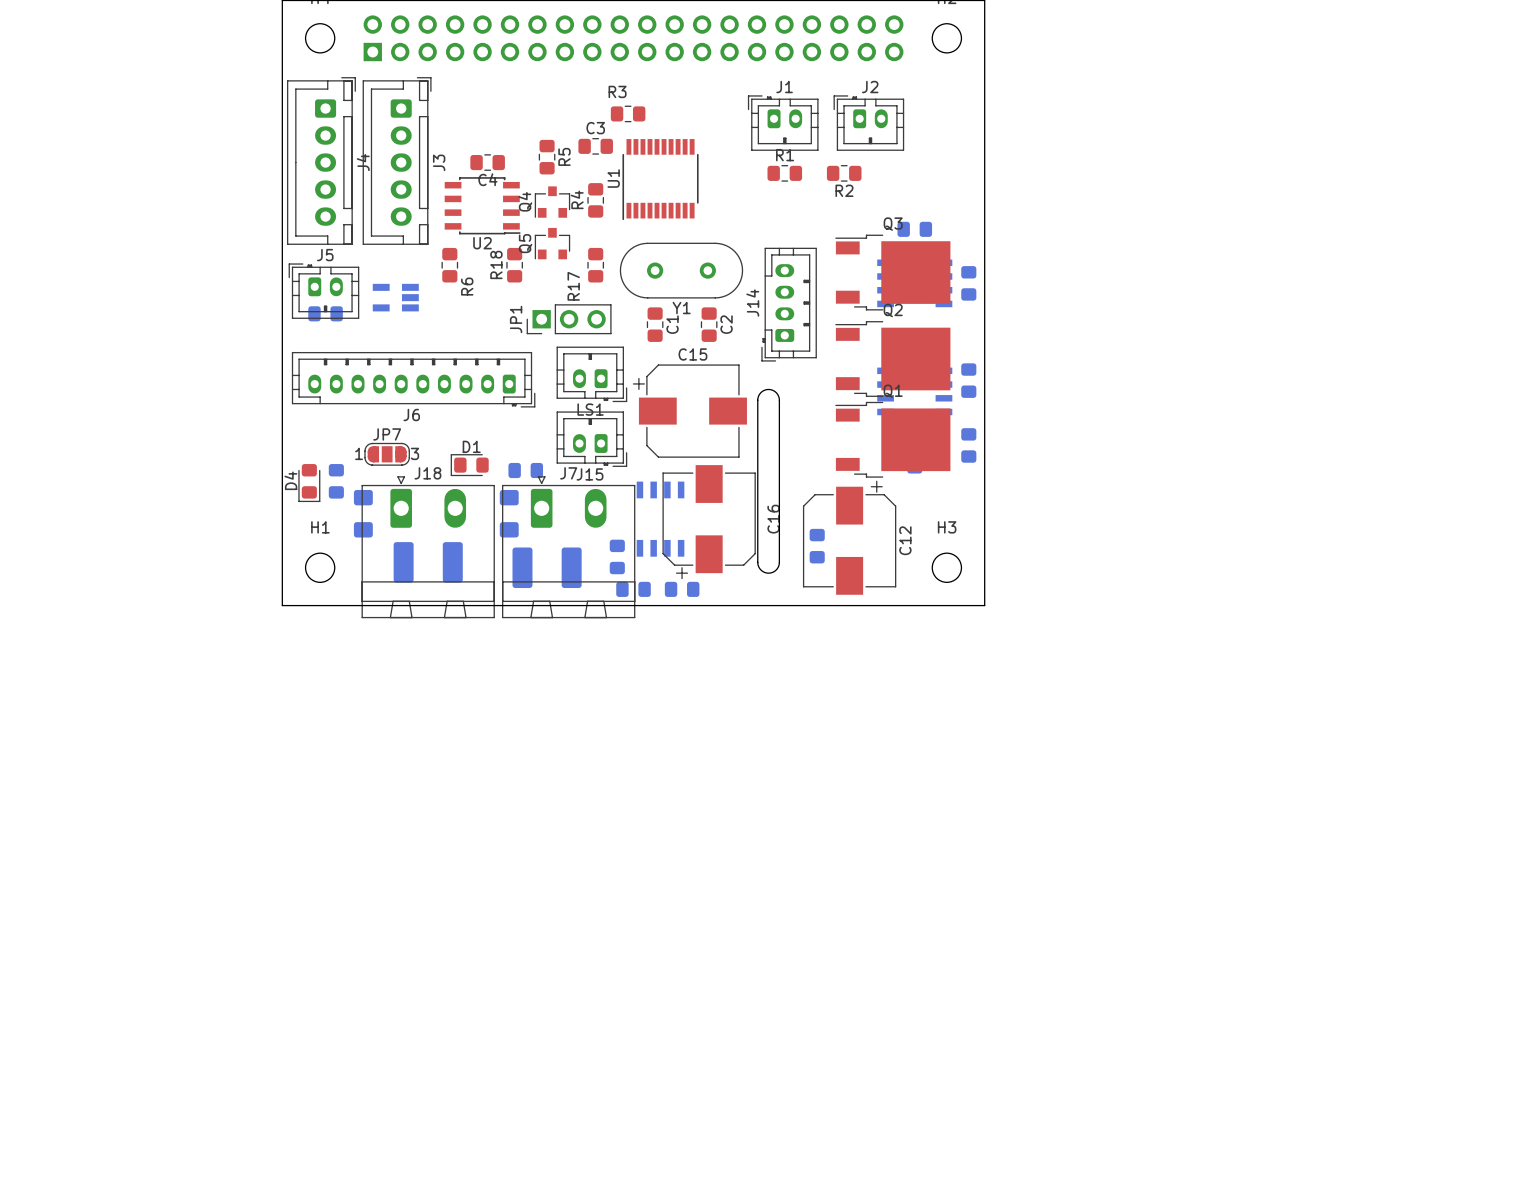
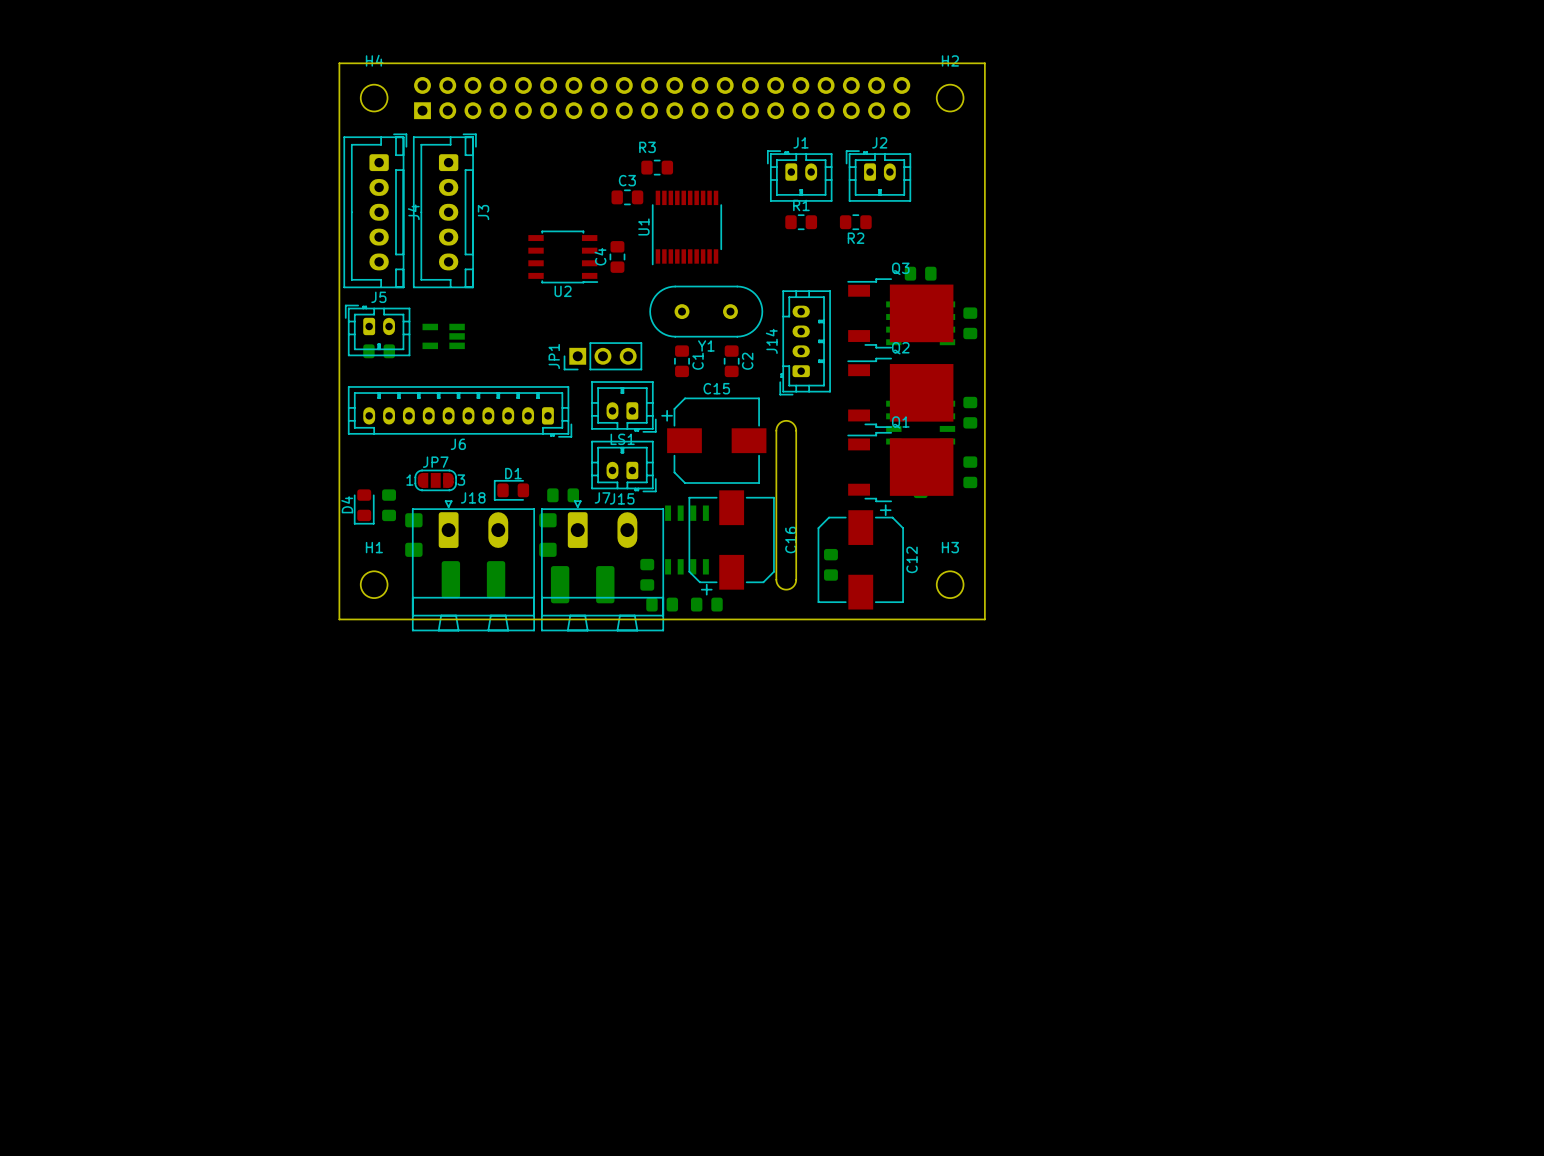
R5: (547, 157) -> none
C4 rotation: 0° (487, 162) -> 90° clockwise (617, 256)
C4 position: (487, 162) -> (617, 256)
R4: (595, 200) -> none
Q4: (552, 202) -> none
U2 position: (482, 205) -> (563, 256)
Q5: (552, 243) -> none
R6: (449, 265) -> none
R18: (514, 265) -> none
R17: (595, 265) -> none

